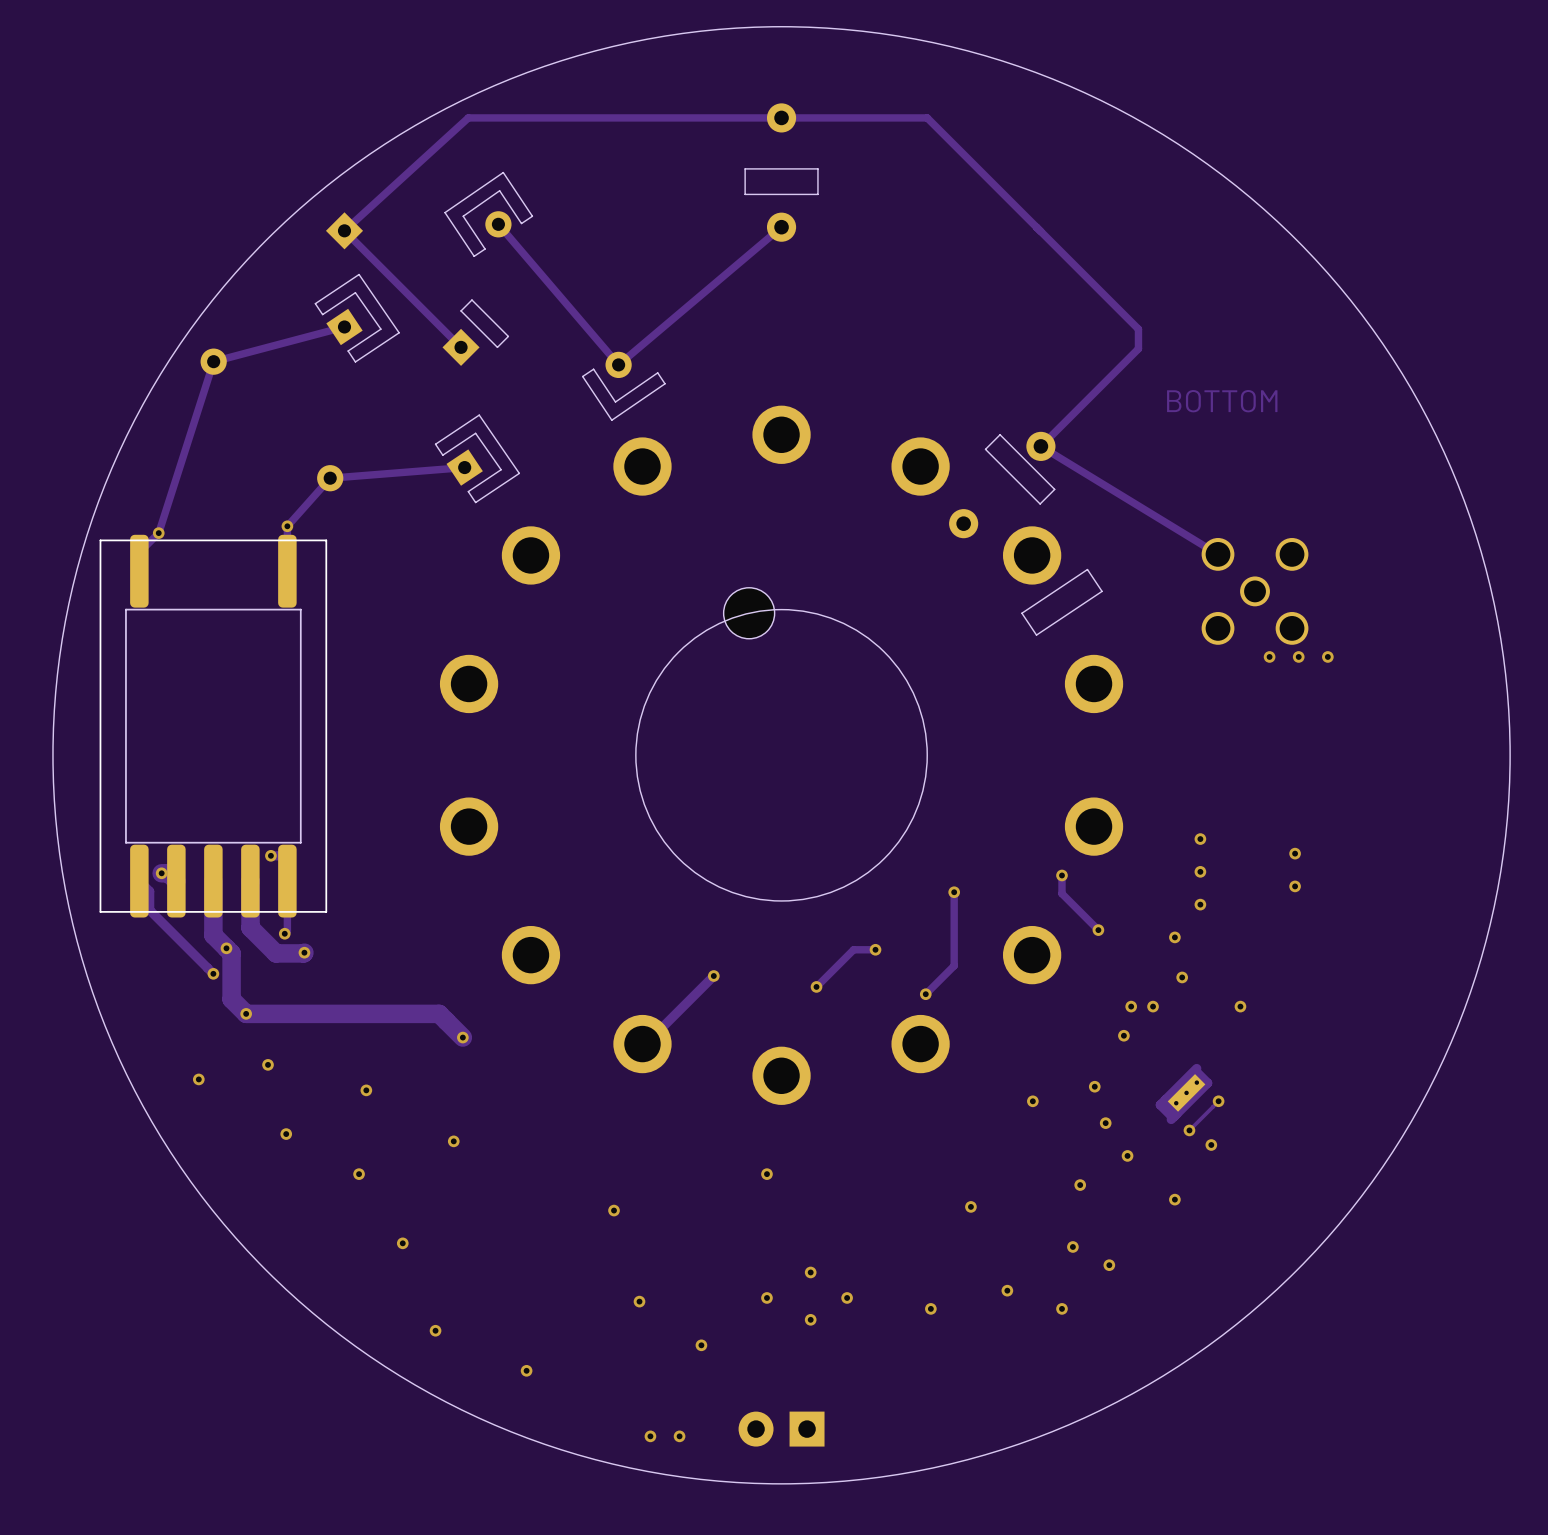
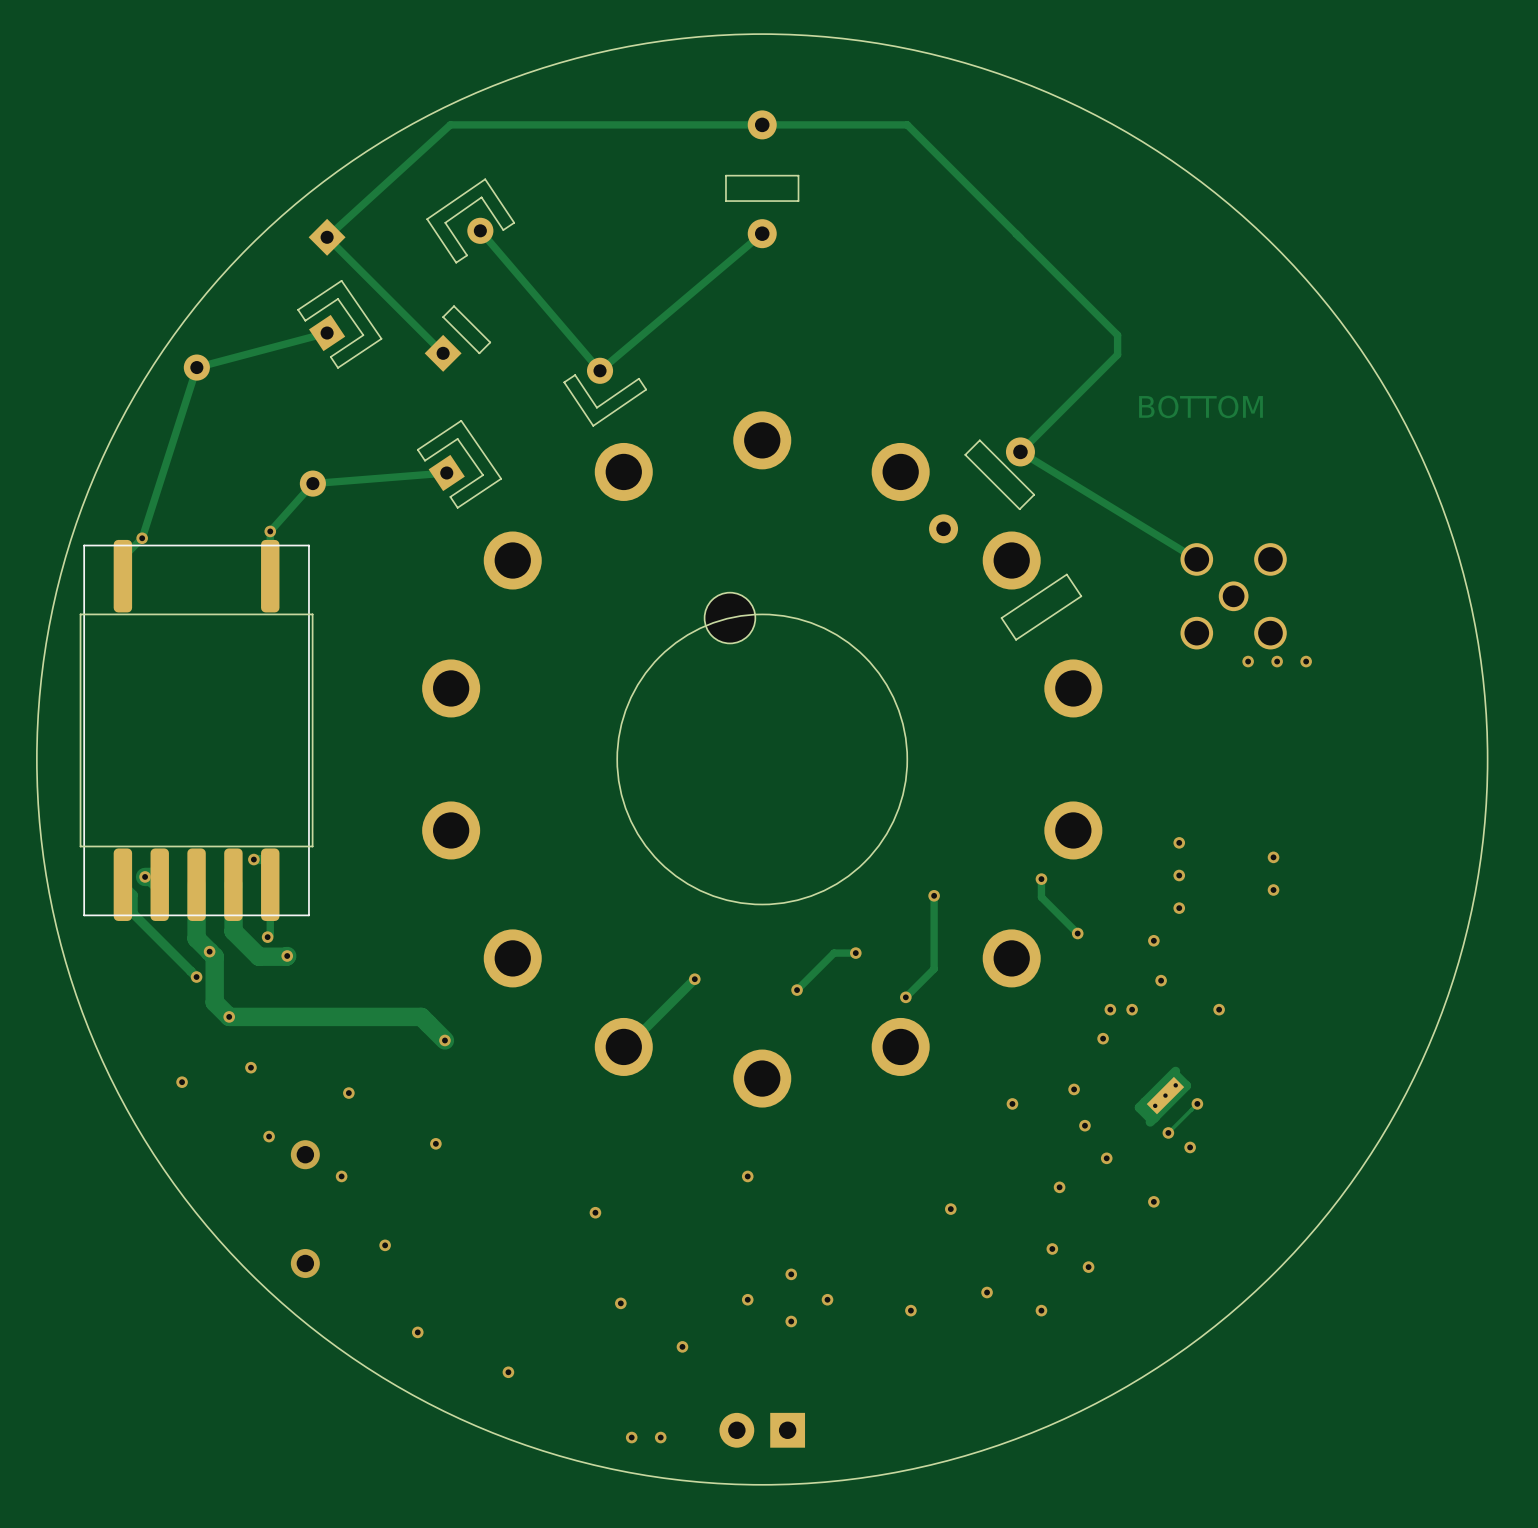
part footprint: [99, 534, 328, 918] -> [79, 539, 314, 921]
via: none -> (305, 1154)
via: none -> (305, 1263)

